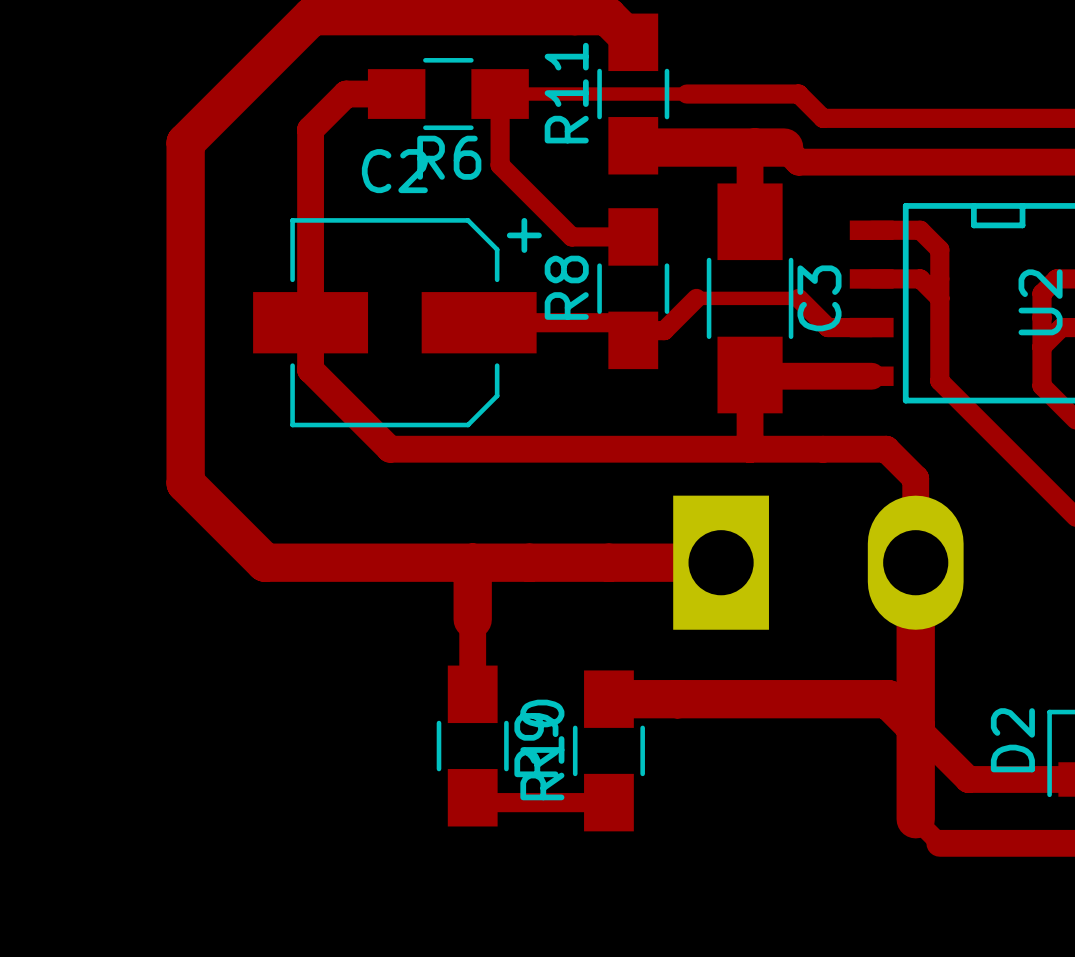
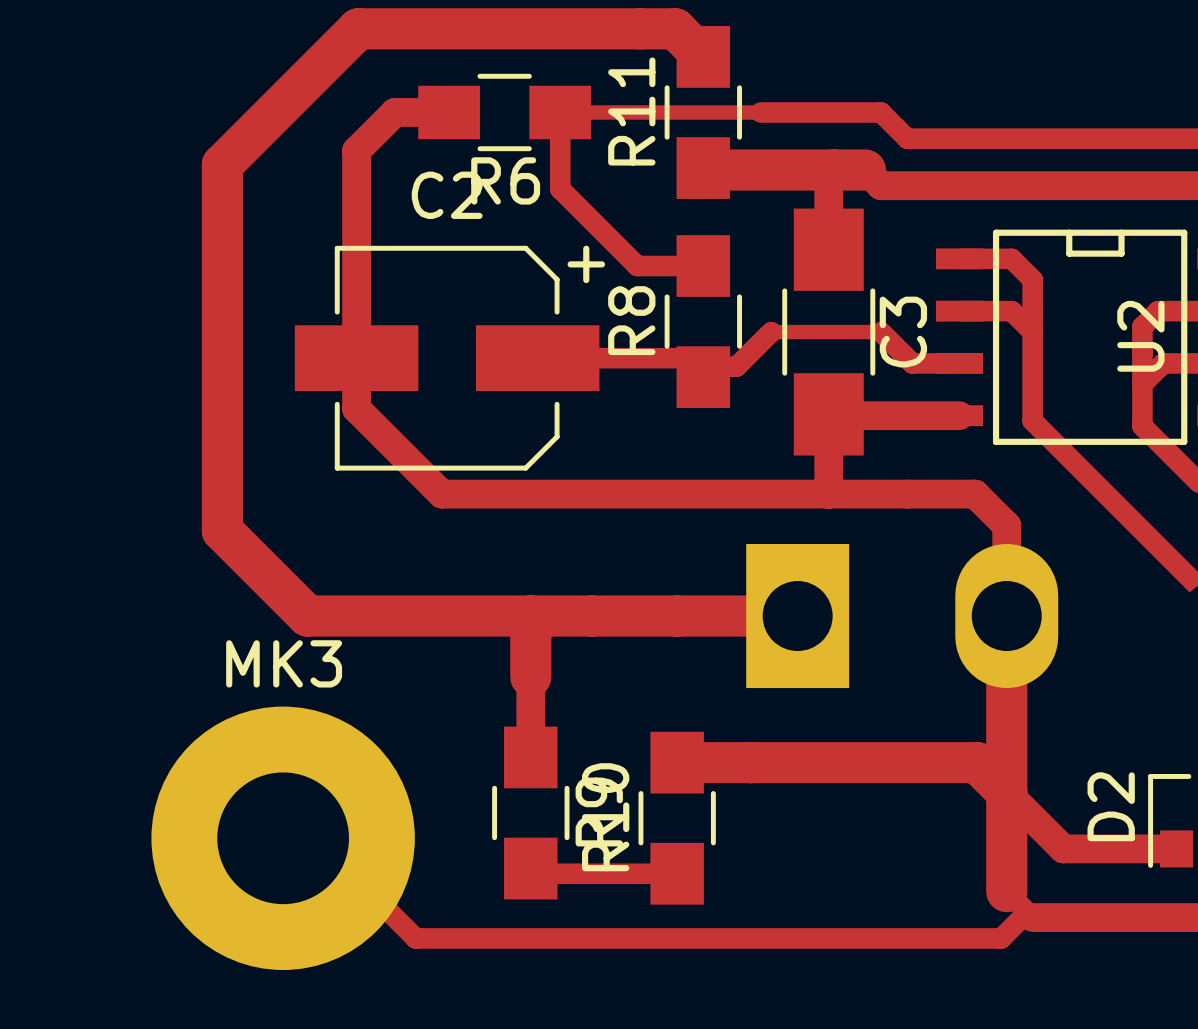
track: none -> (283, 838) (315, 838) (415, 938) (1001, 938) (1027, 912)
MK3: none -> (283, 838)

